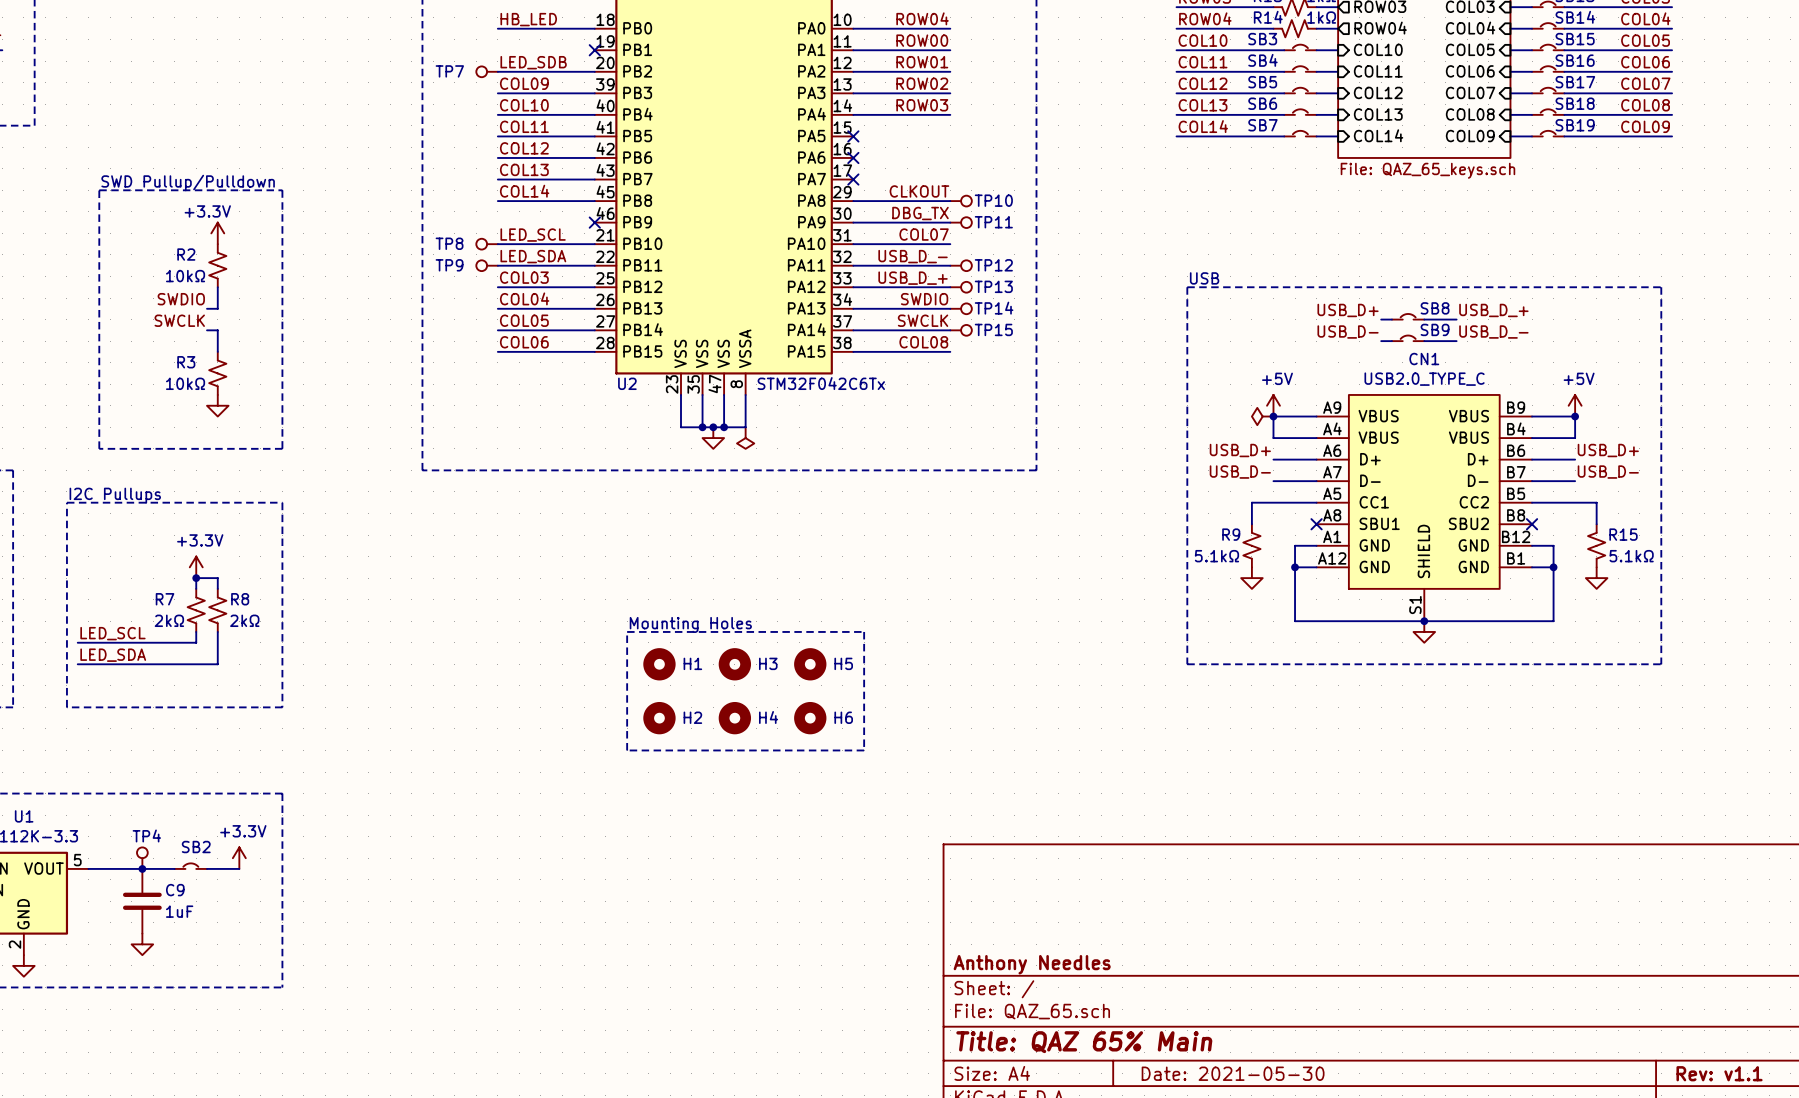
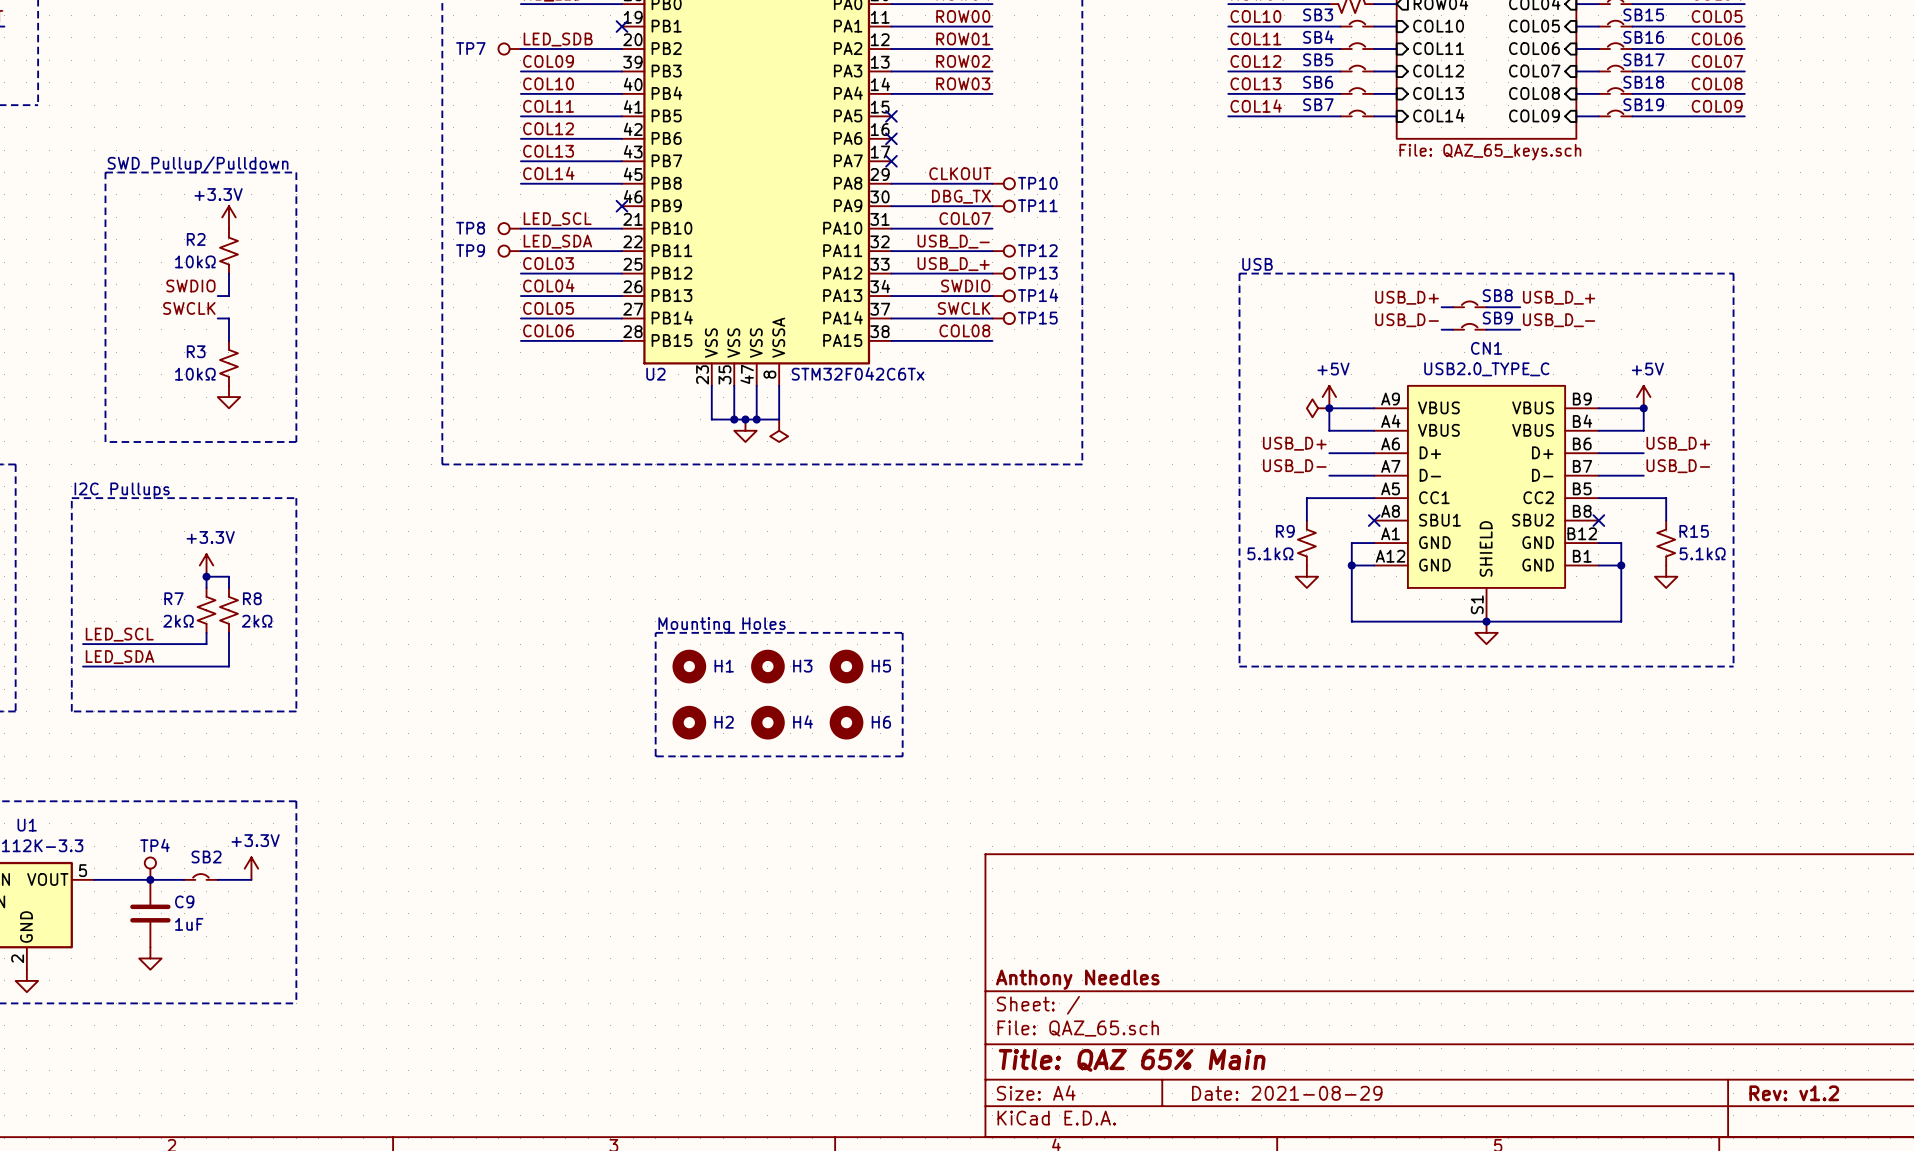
title block: Date: 2021-05-30 (1233, 1073) -> Date: 2021-08-29 (1287, 1093)
title block: Rev: v1.1 (1719, 1073) -> Rev: v1.2 (1794, 1093)

